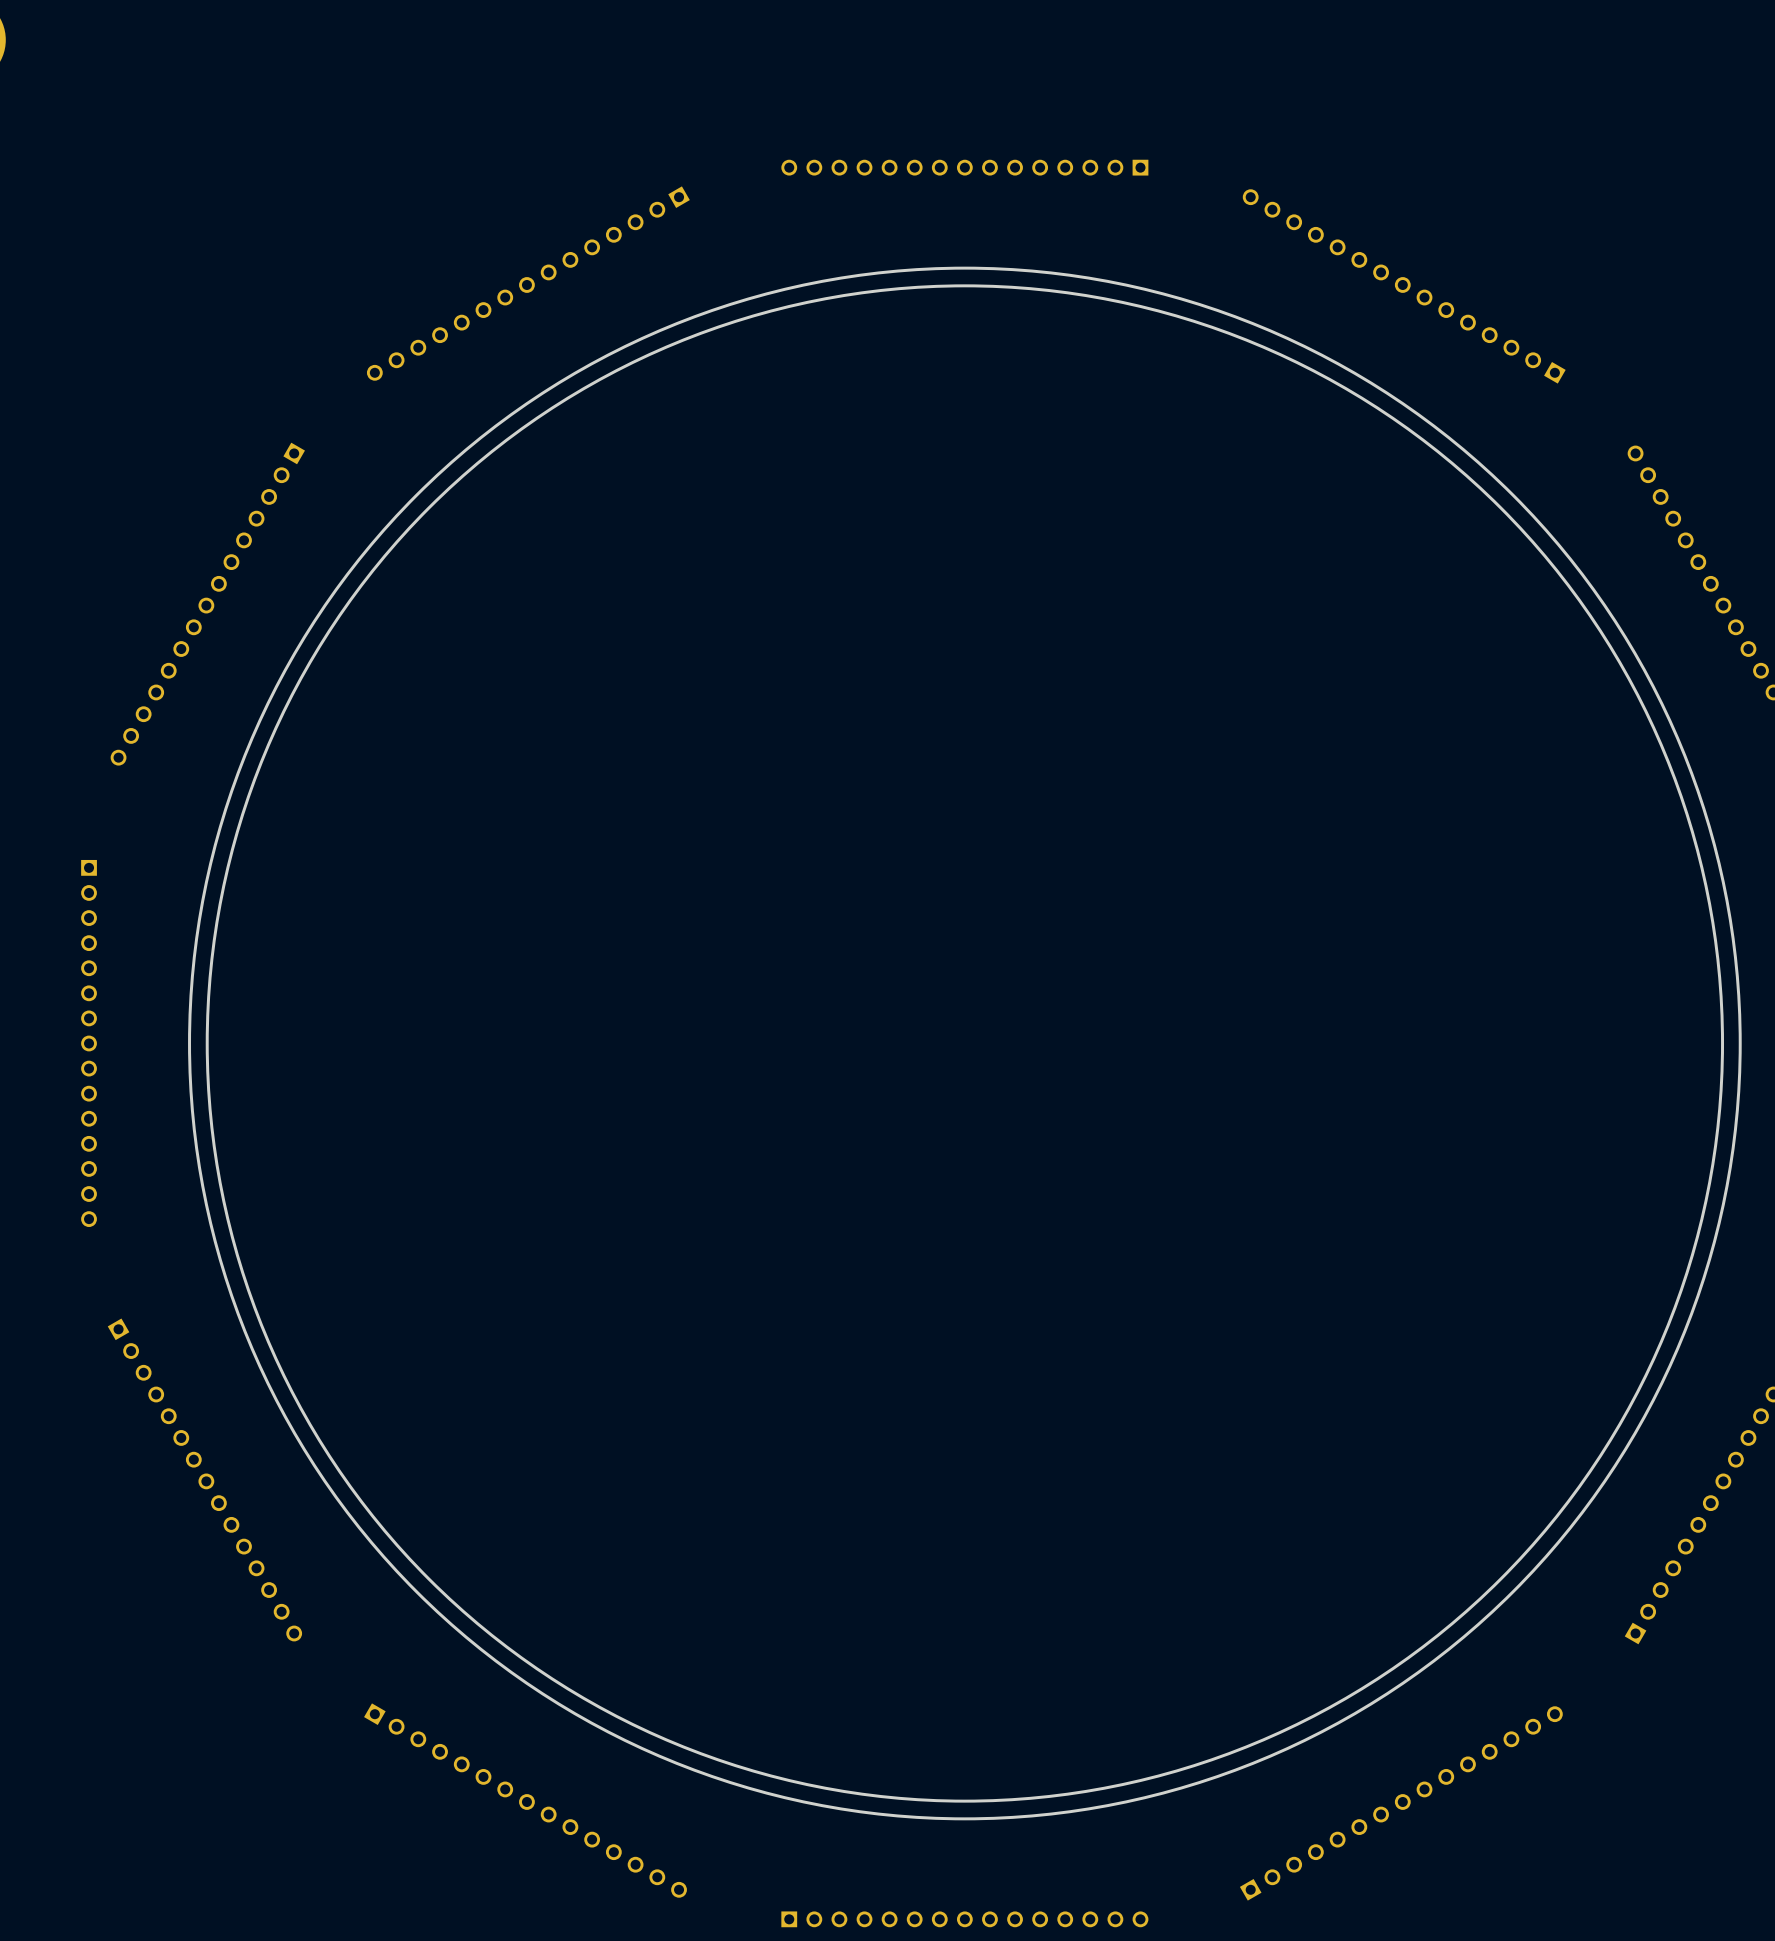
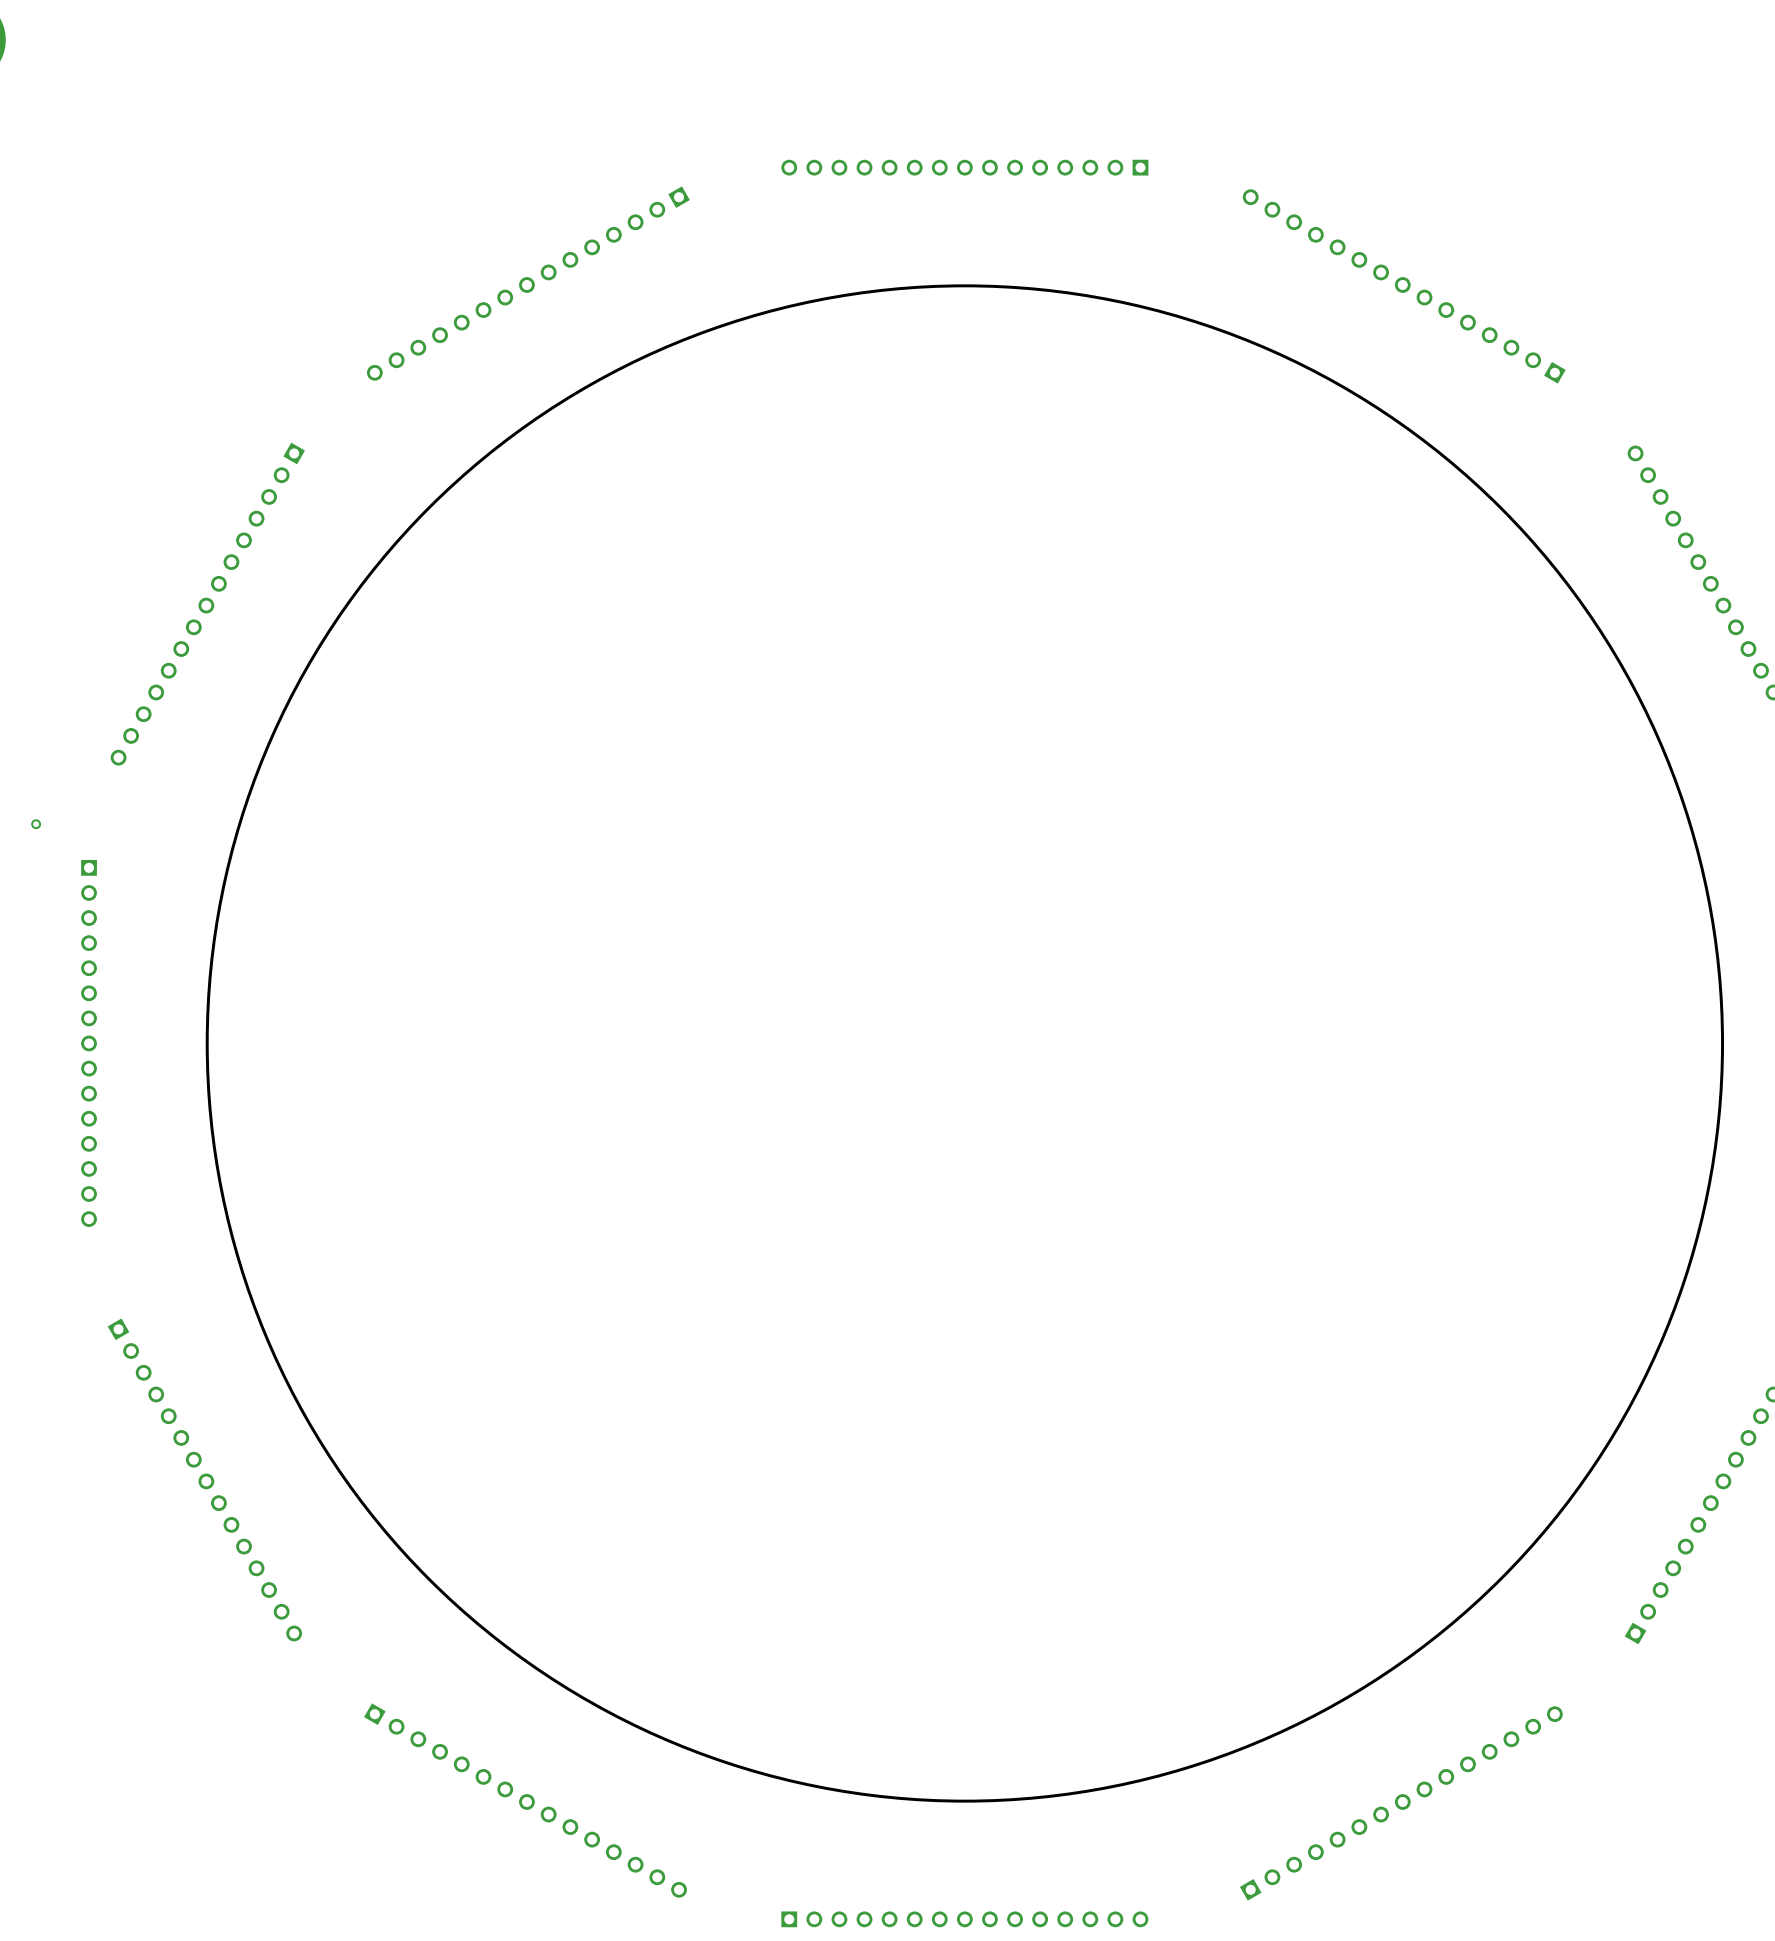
round board edge: [188, 266, 1742, 1821] -> none
via: none -> (36, 824)

